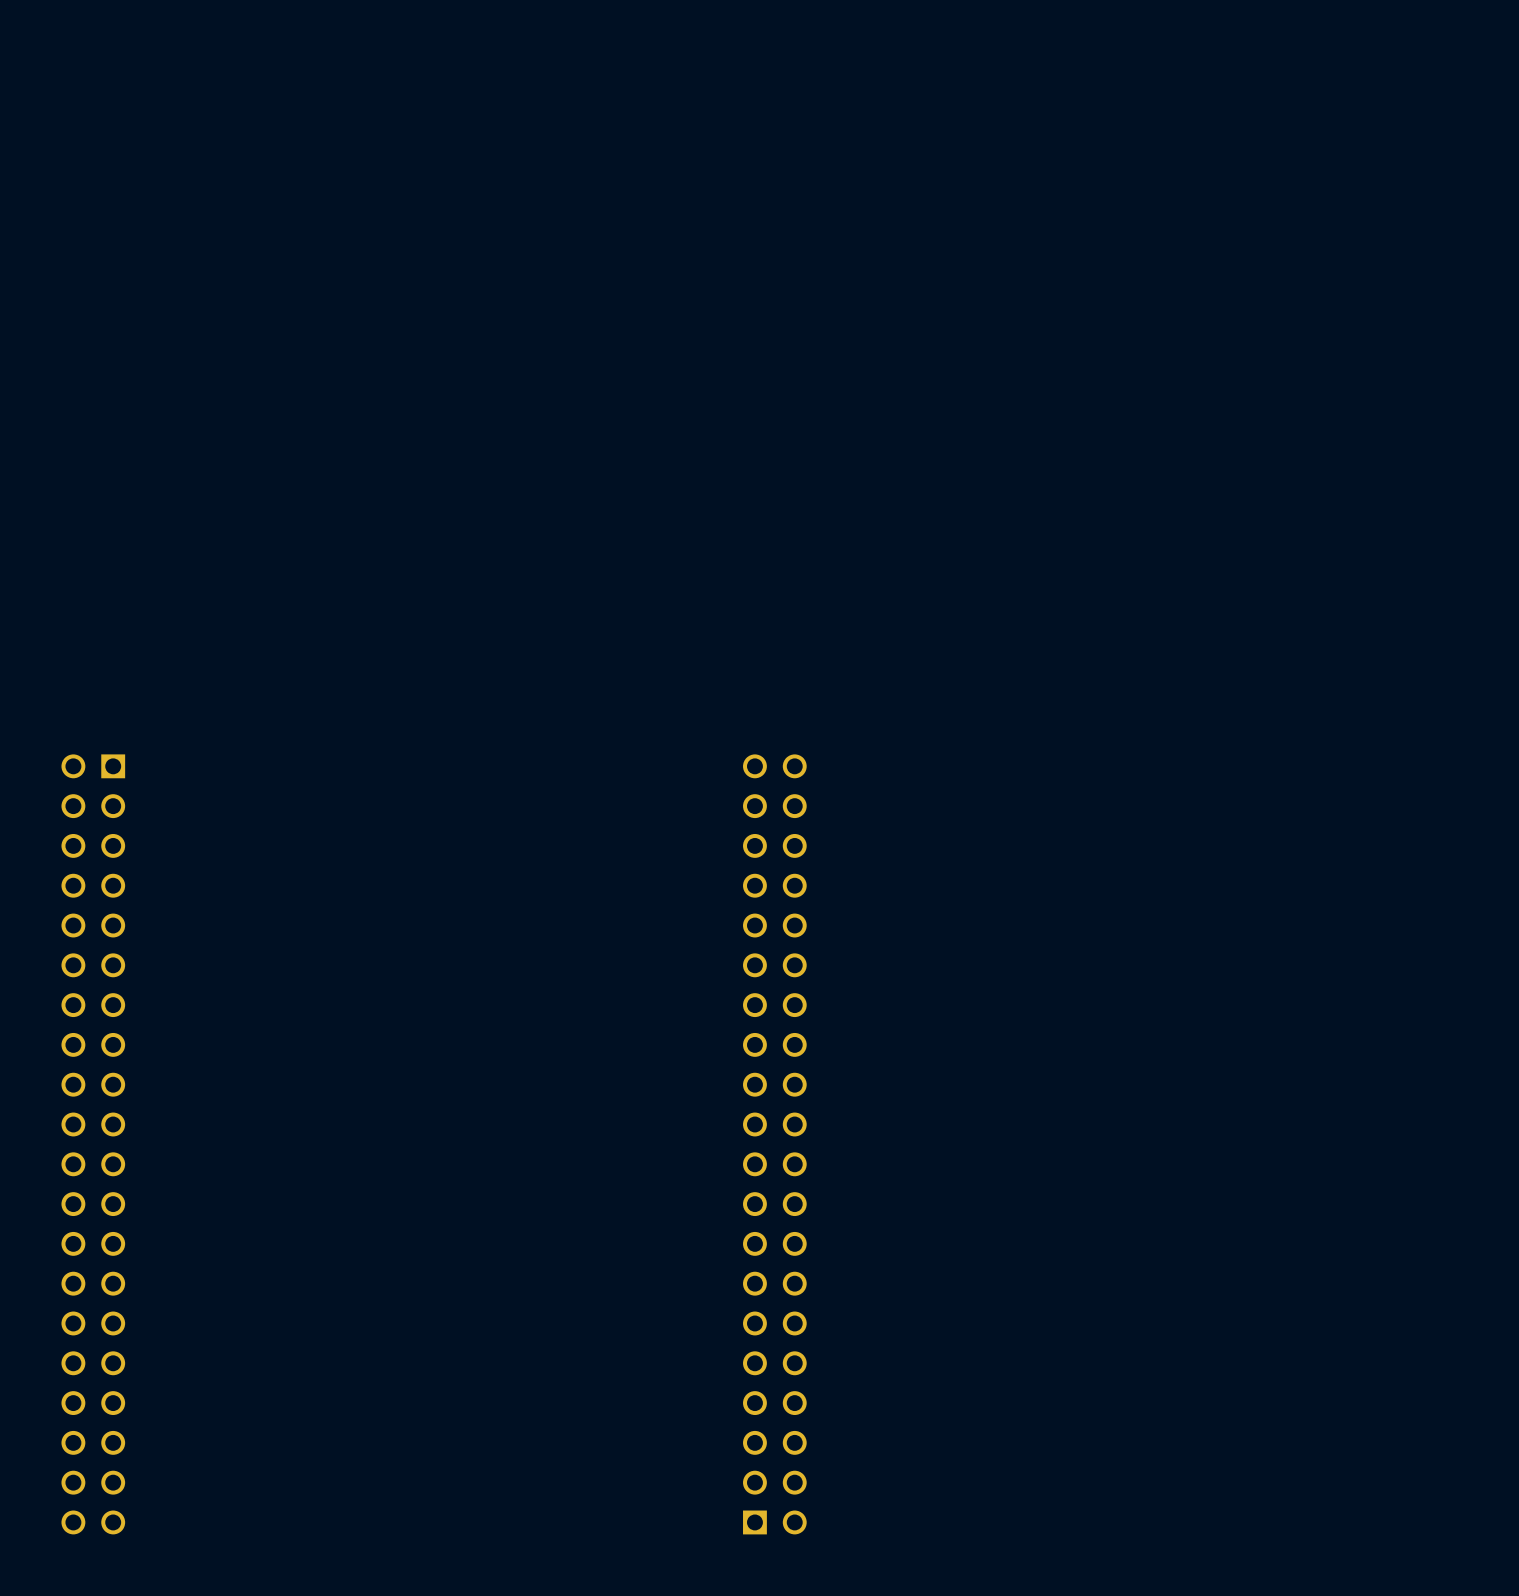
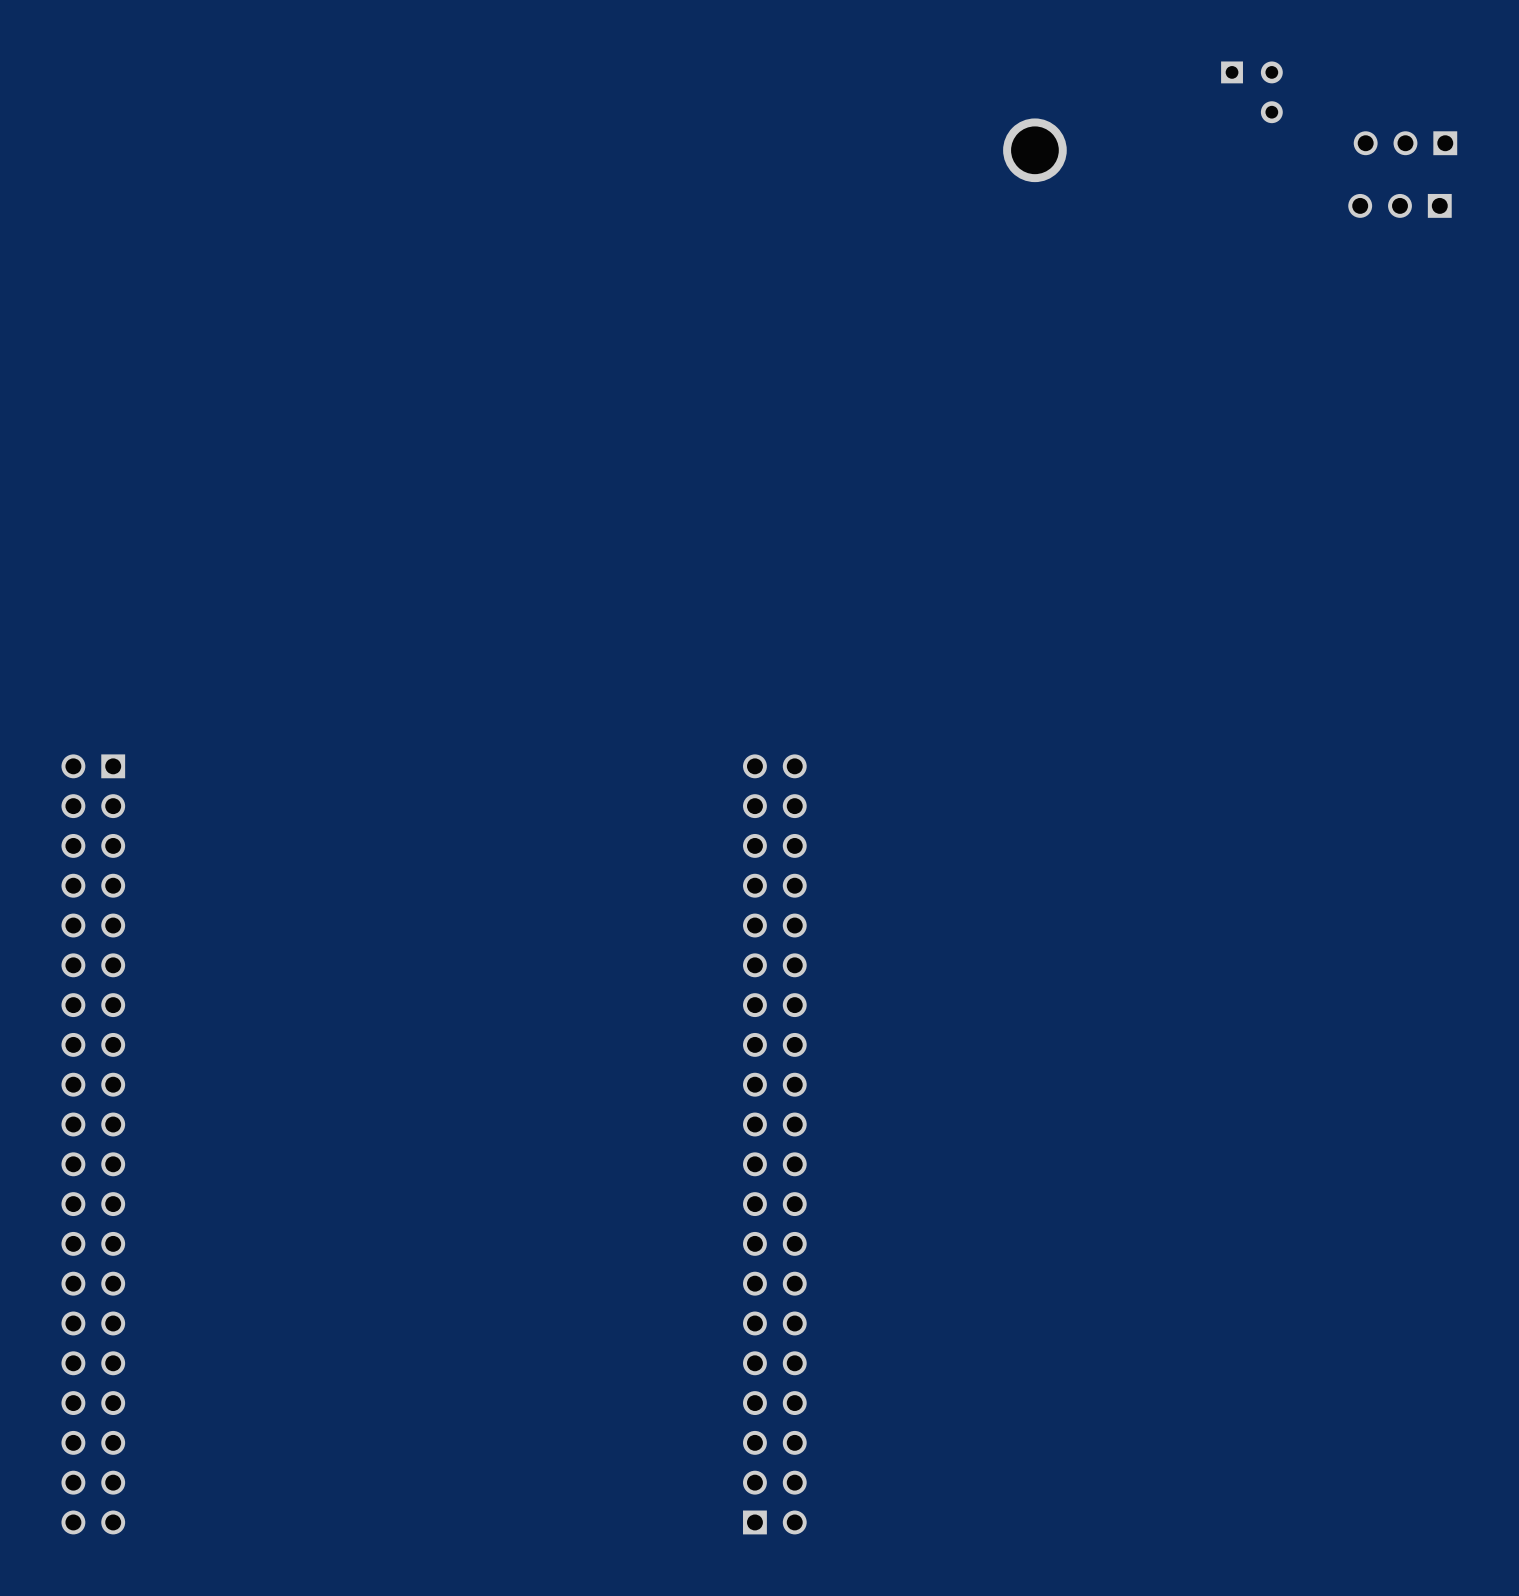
part: none -> (1251, 92)
part: none -> (1405, 143)
part: none -> (1034, 150)
part: none -> (1399, 205)

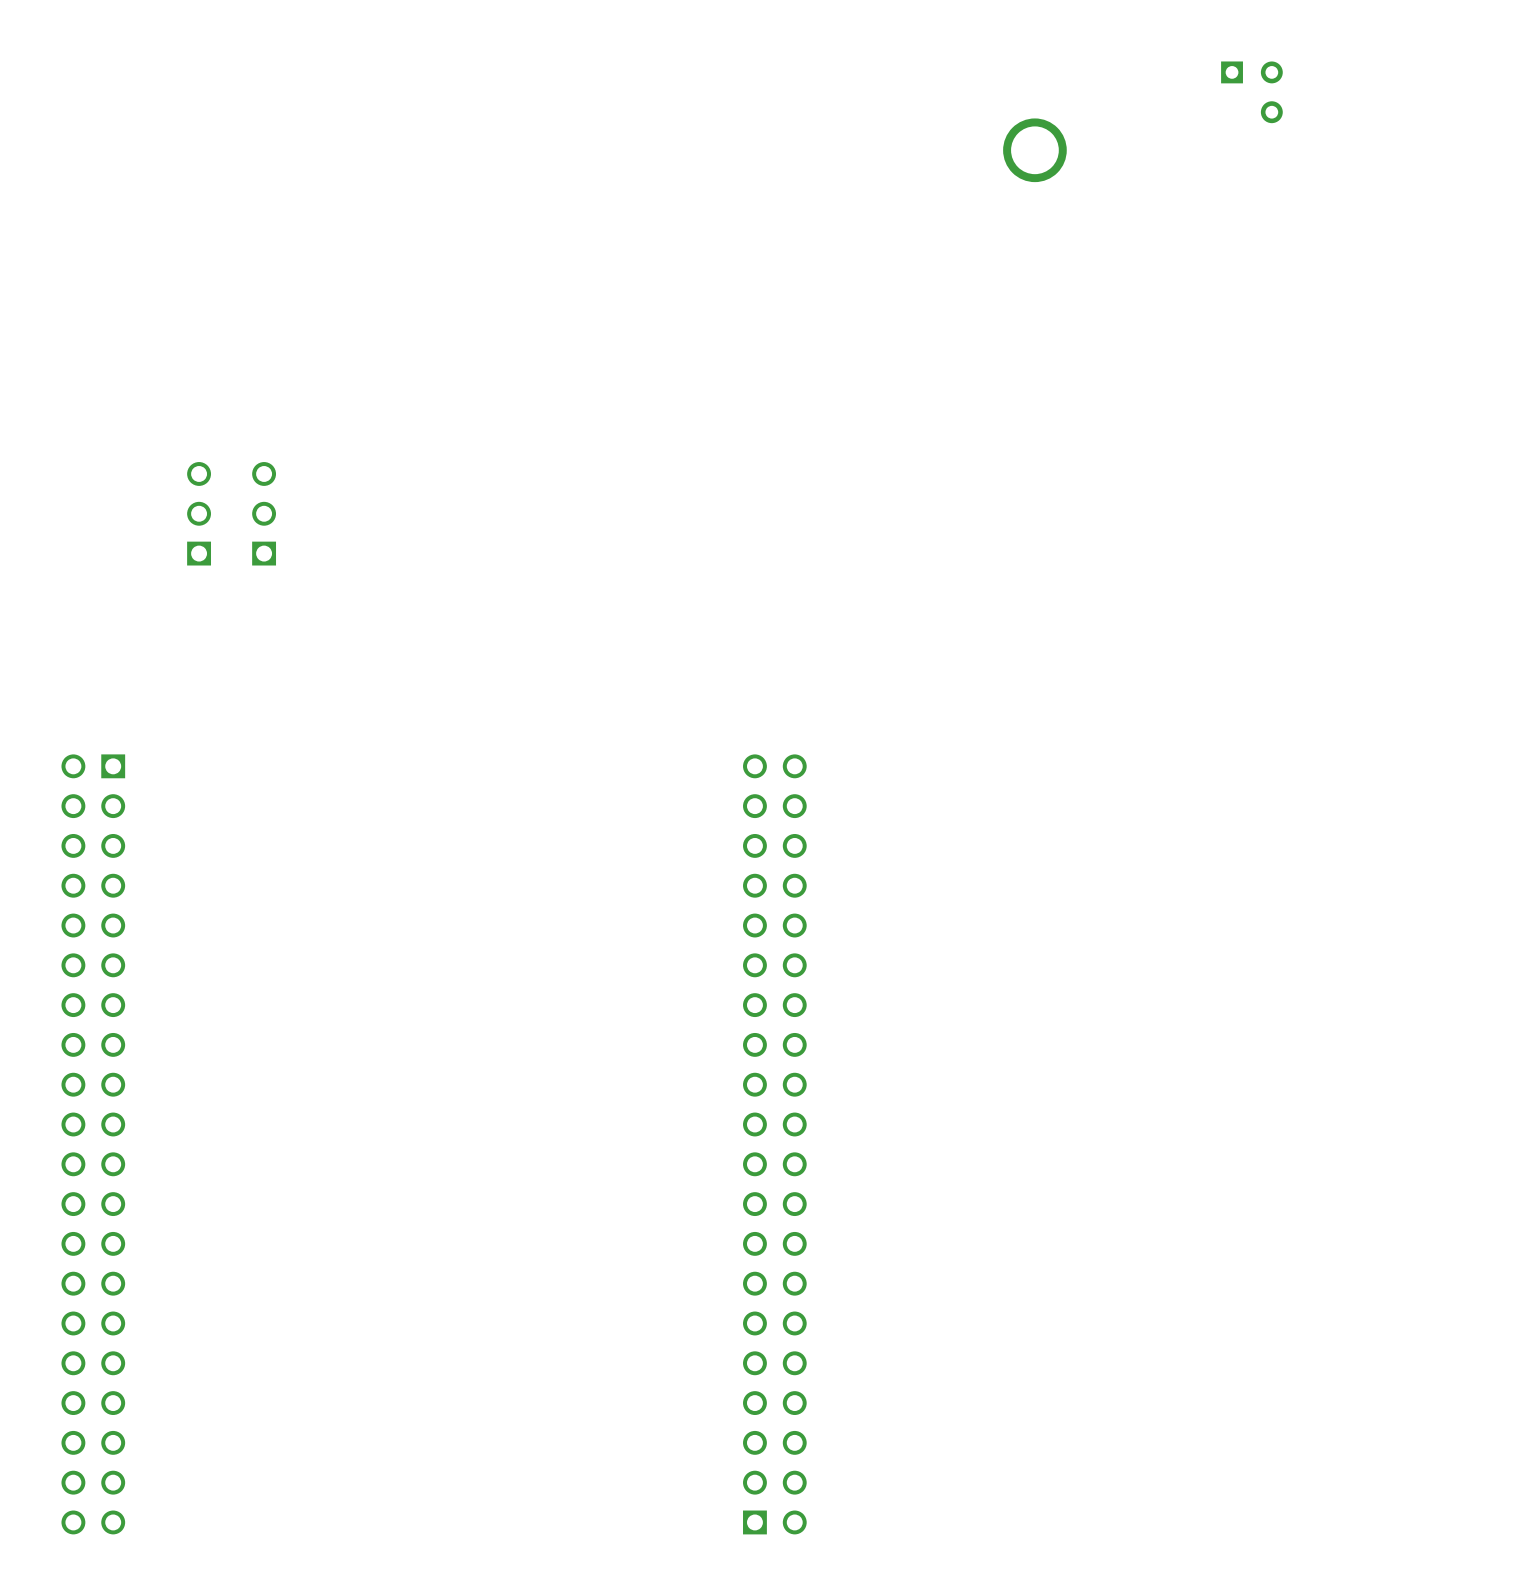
part: (1405, 143) -> none
part: (1399, 205) -> none
part: none -> (199, 513)
part: none -> (264, 513)

